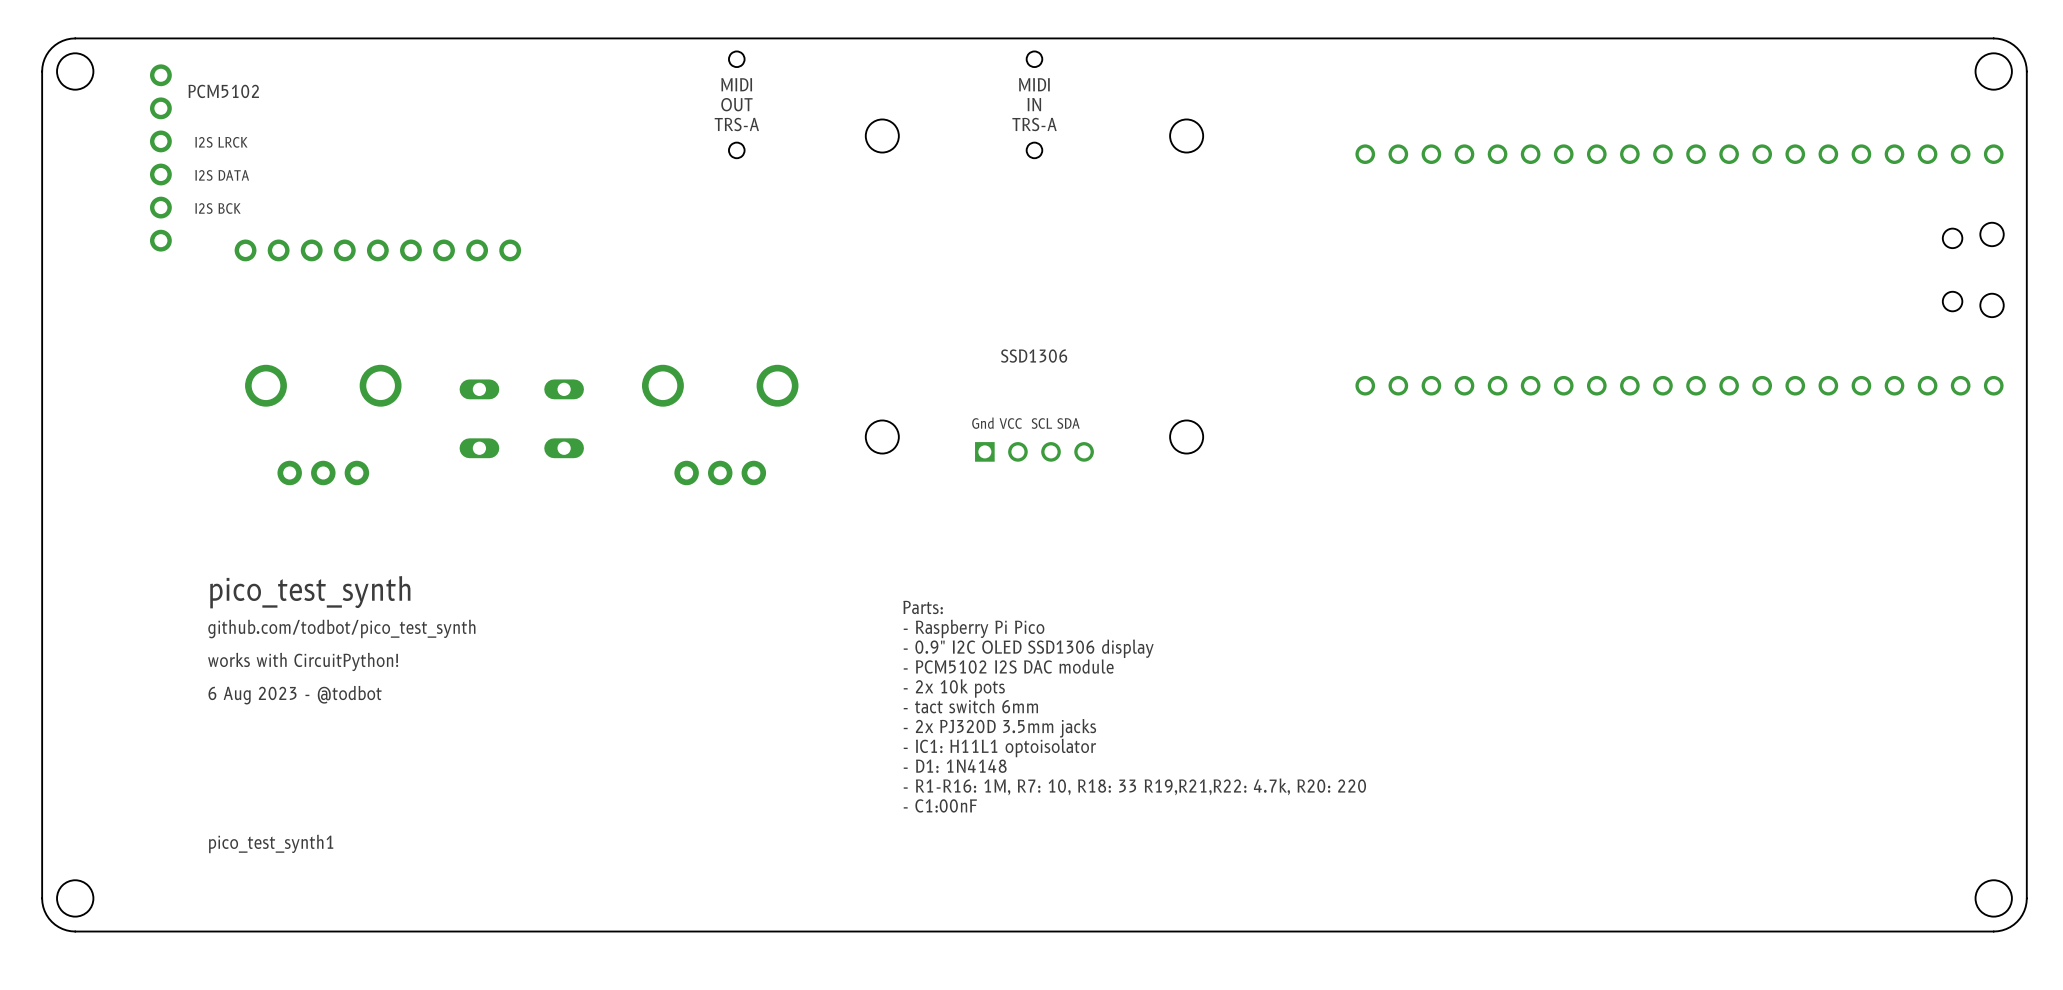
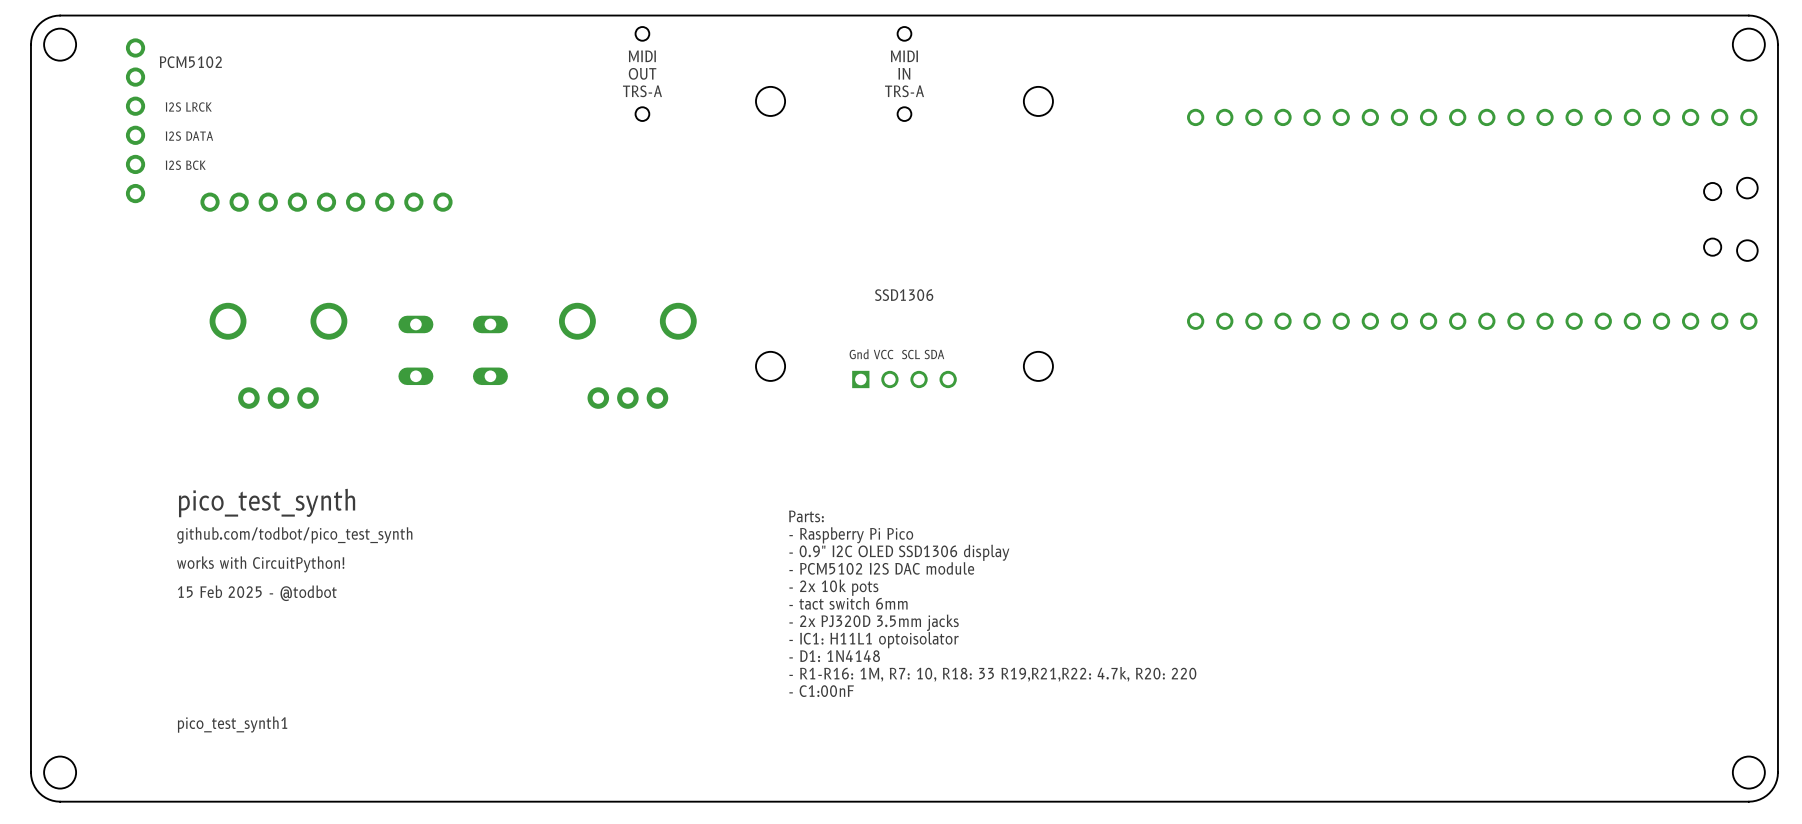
text: 6 Aug 2023 - @todbot (295, 695) -> 15 Feb 2025 - @todbot (257, 593)

